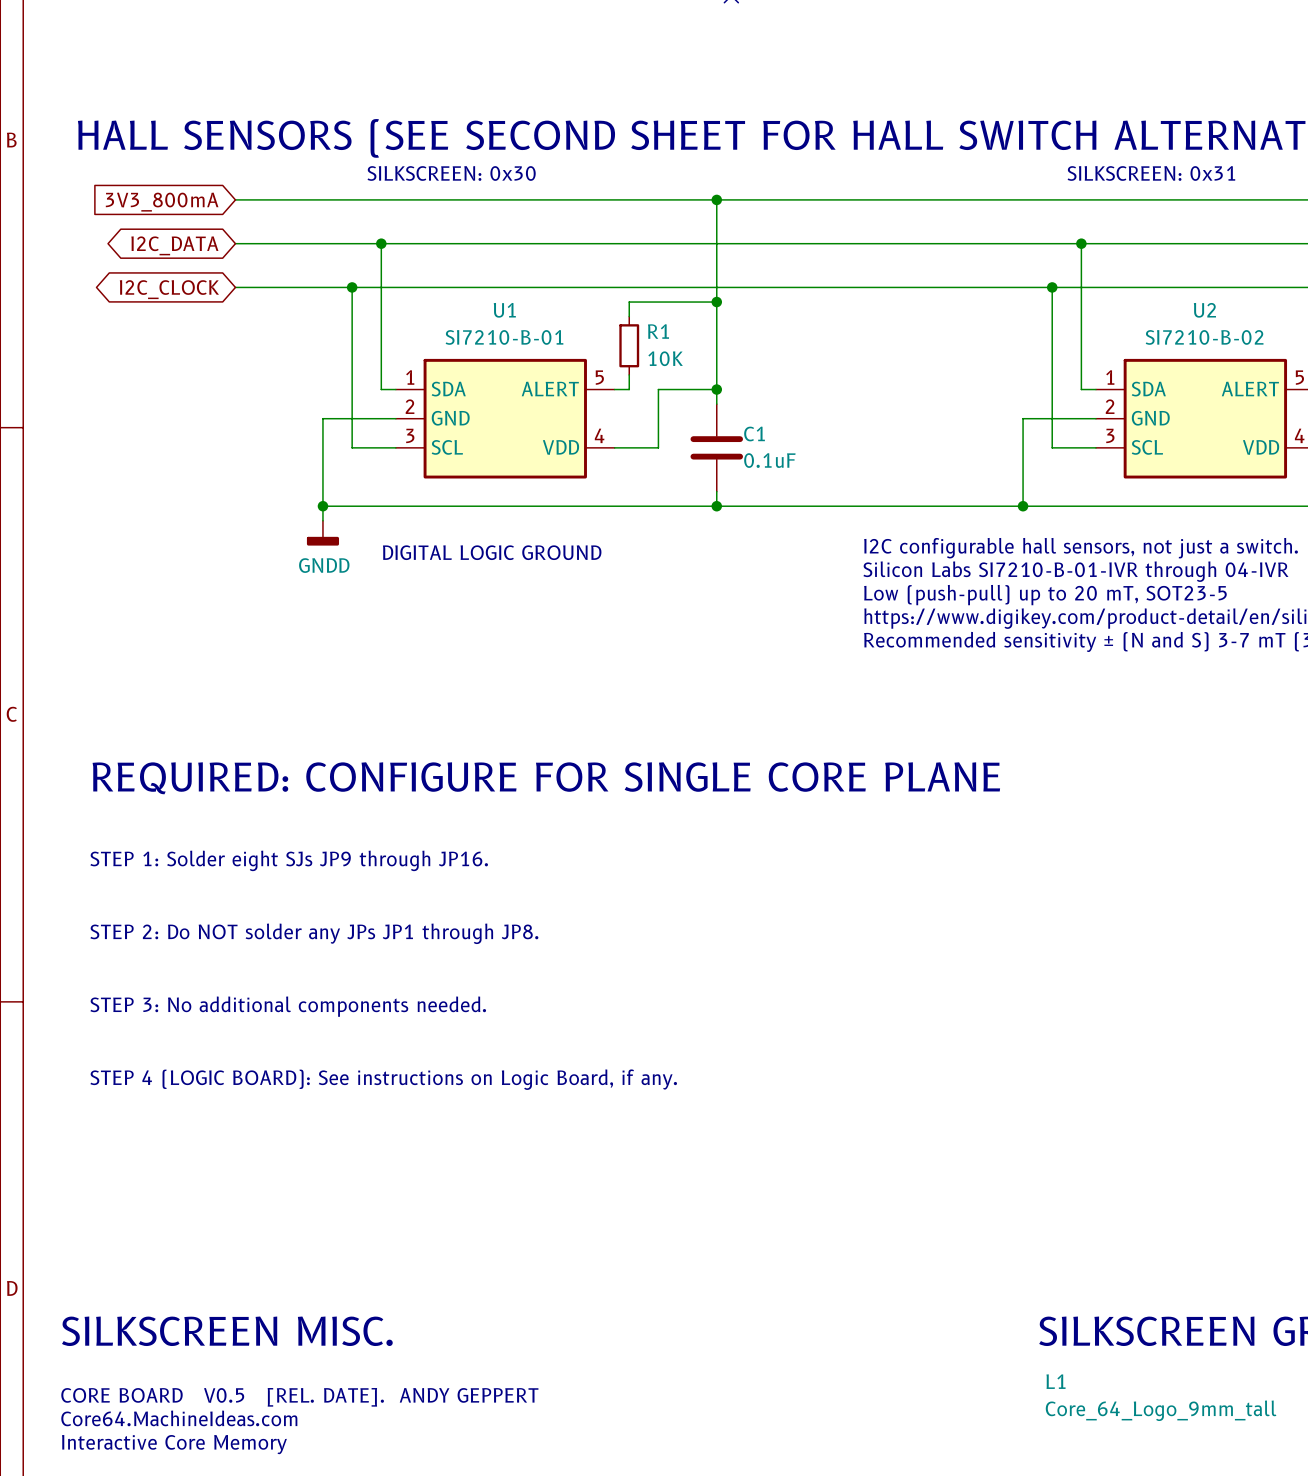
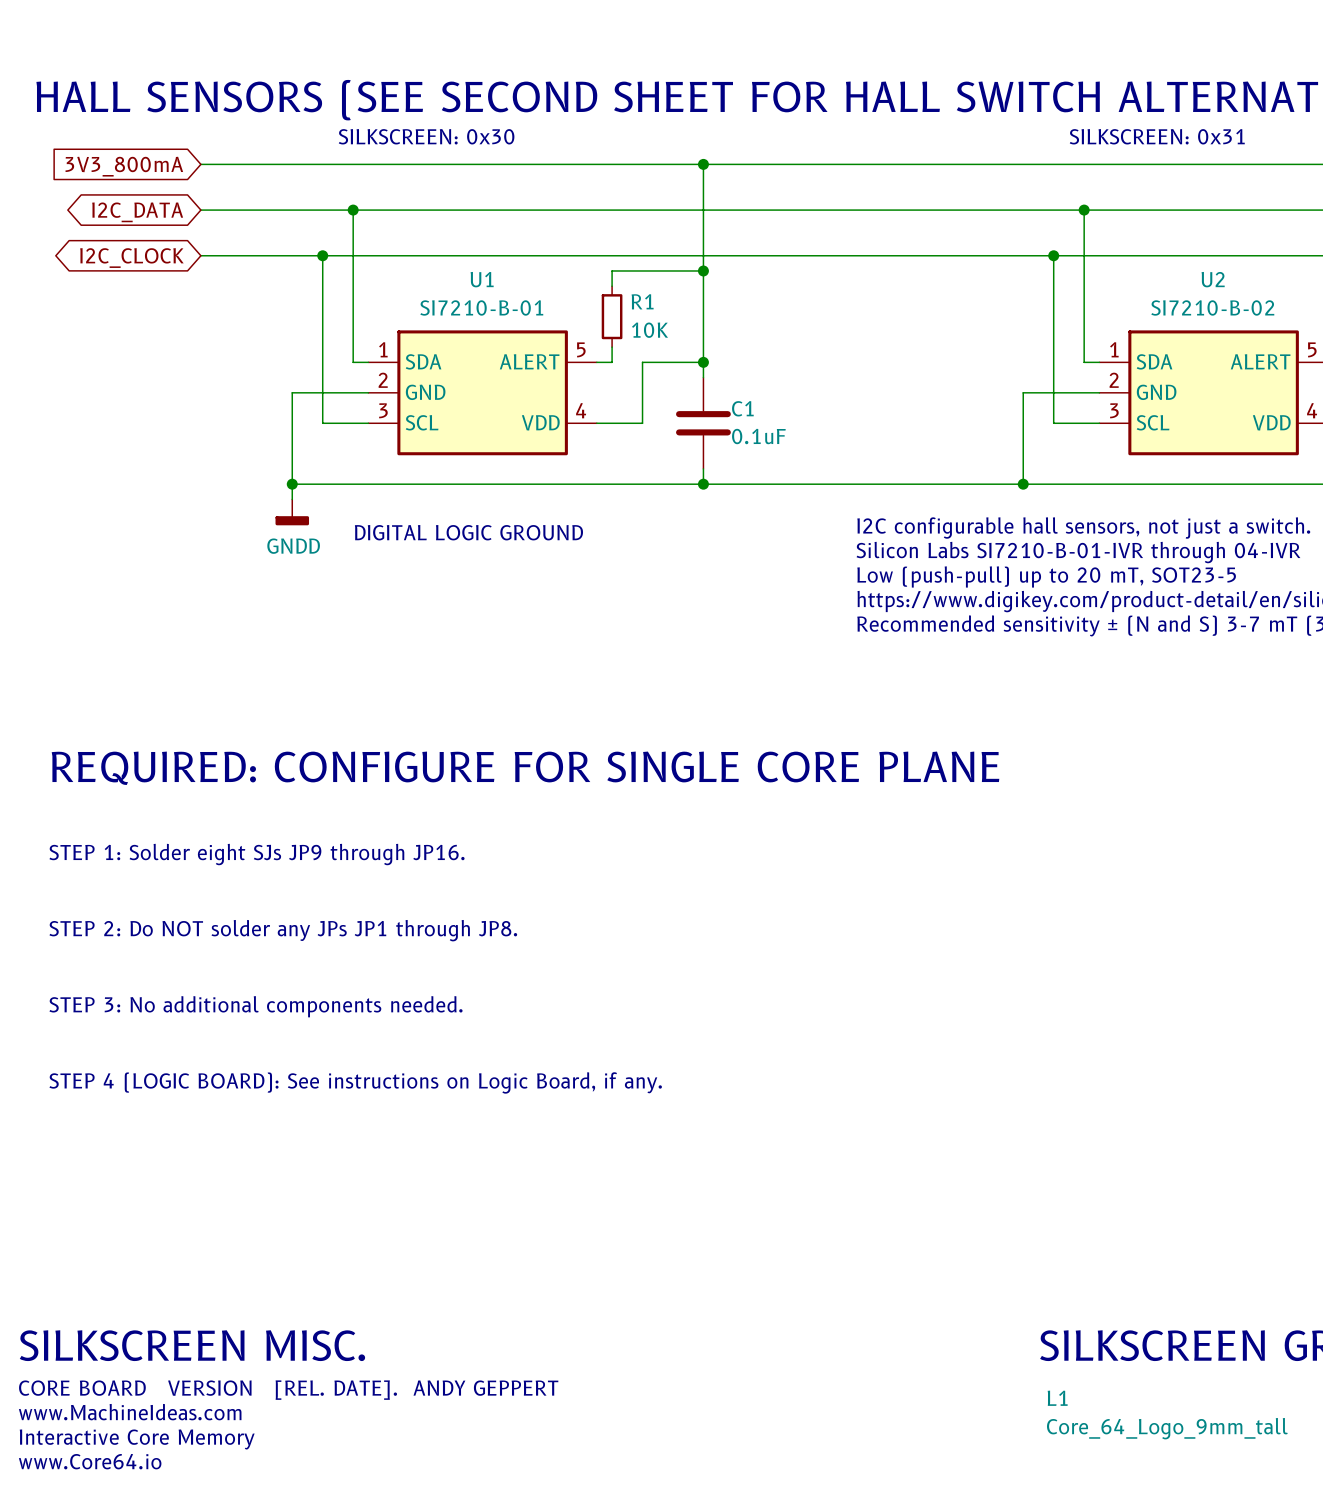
text: none -> CORE BOARD VERSION [REL. DATE]. ANDY GEPPERT (288, 1390)
text: CORE BOARD V0.5 [REL. DATE]. ANDY GEPPERT (299, 1397) -> www.MachineIdeas.com (130, 1412)
text: Core64.MachineIdeas.com (179, 1418) -> Interactive Core Memory (137, 1439)
text: Interactive Core Memory (174, 1444) -> www.Core64.io (90, 1461)

